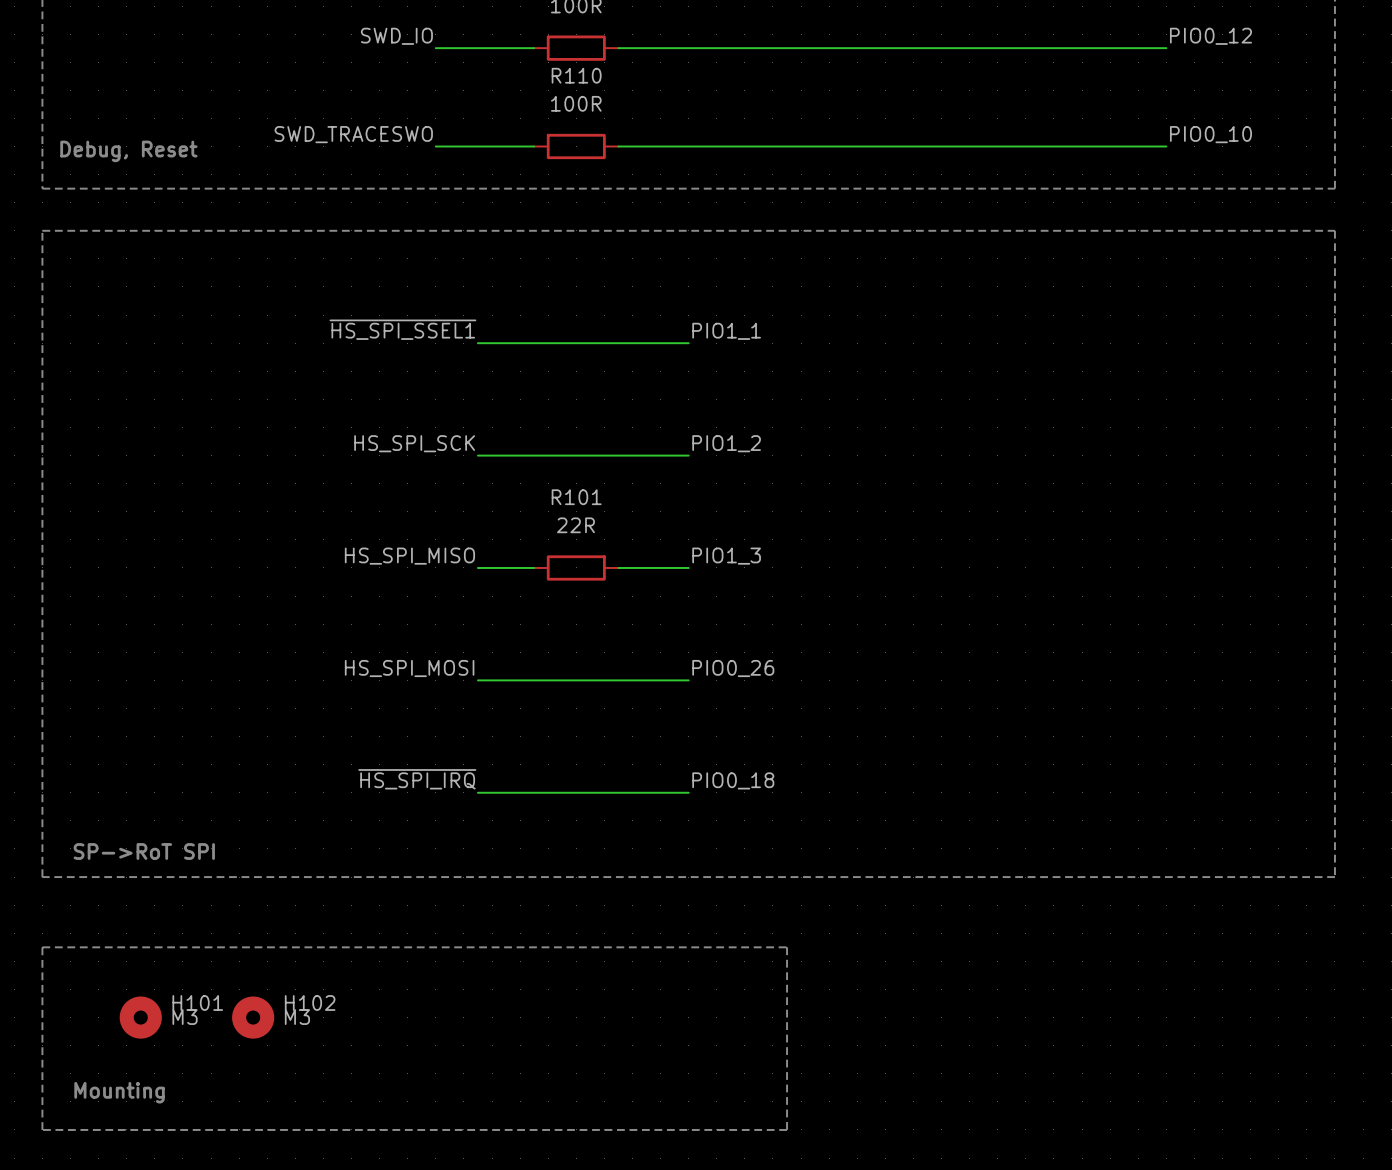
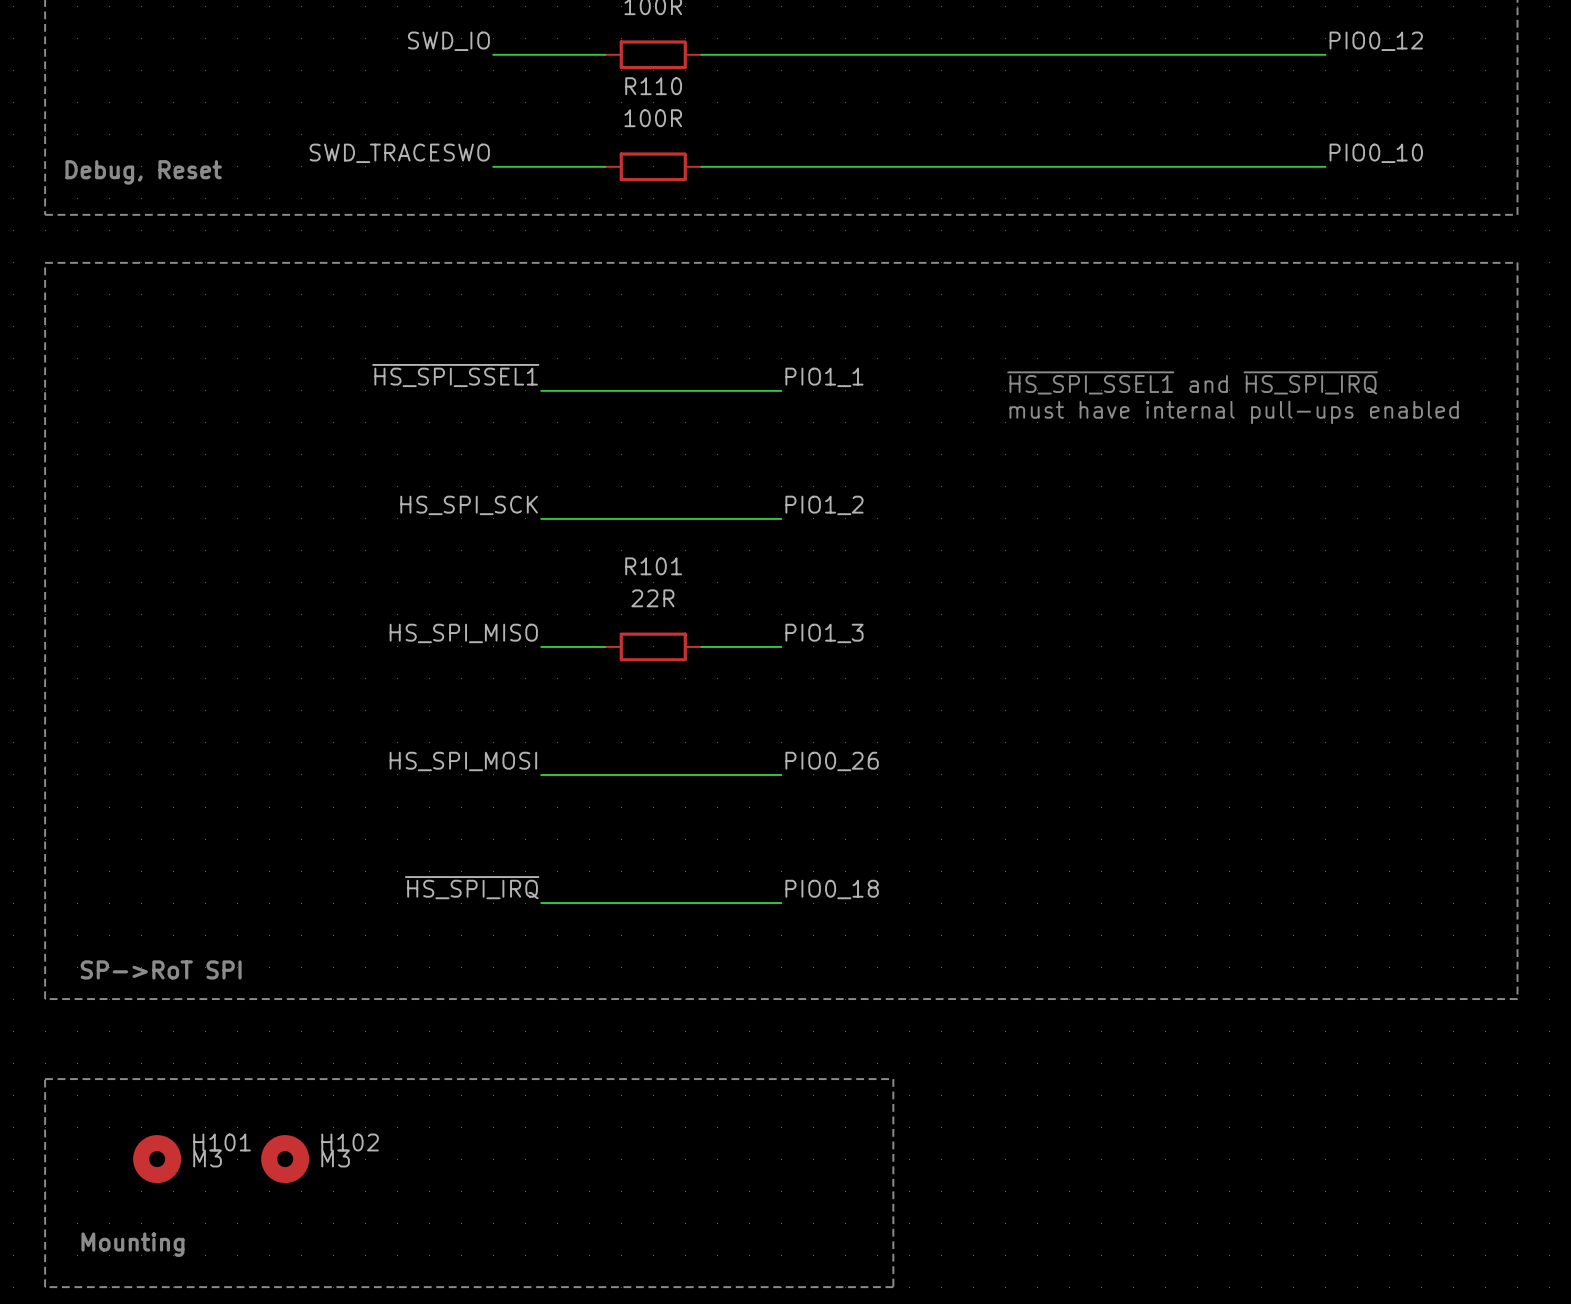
text: none -> ~{HS_SPI_SSEL1} and ~{HS_SPI_IRQ} (1192, 382)
text: none -> must have internal pull-ups enabled (1234, 412)

